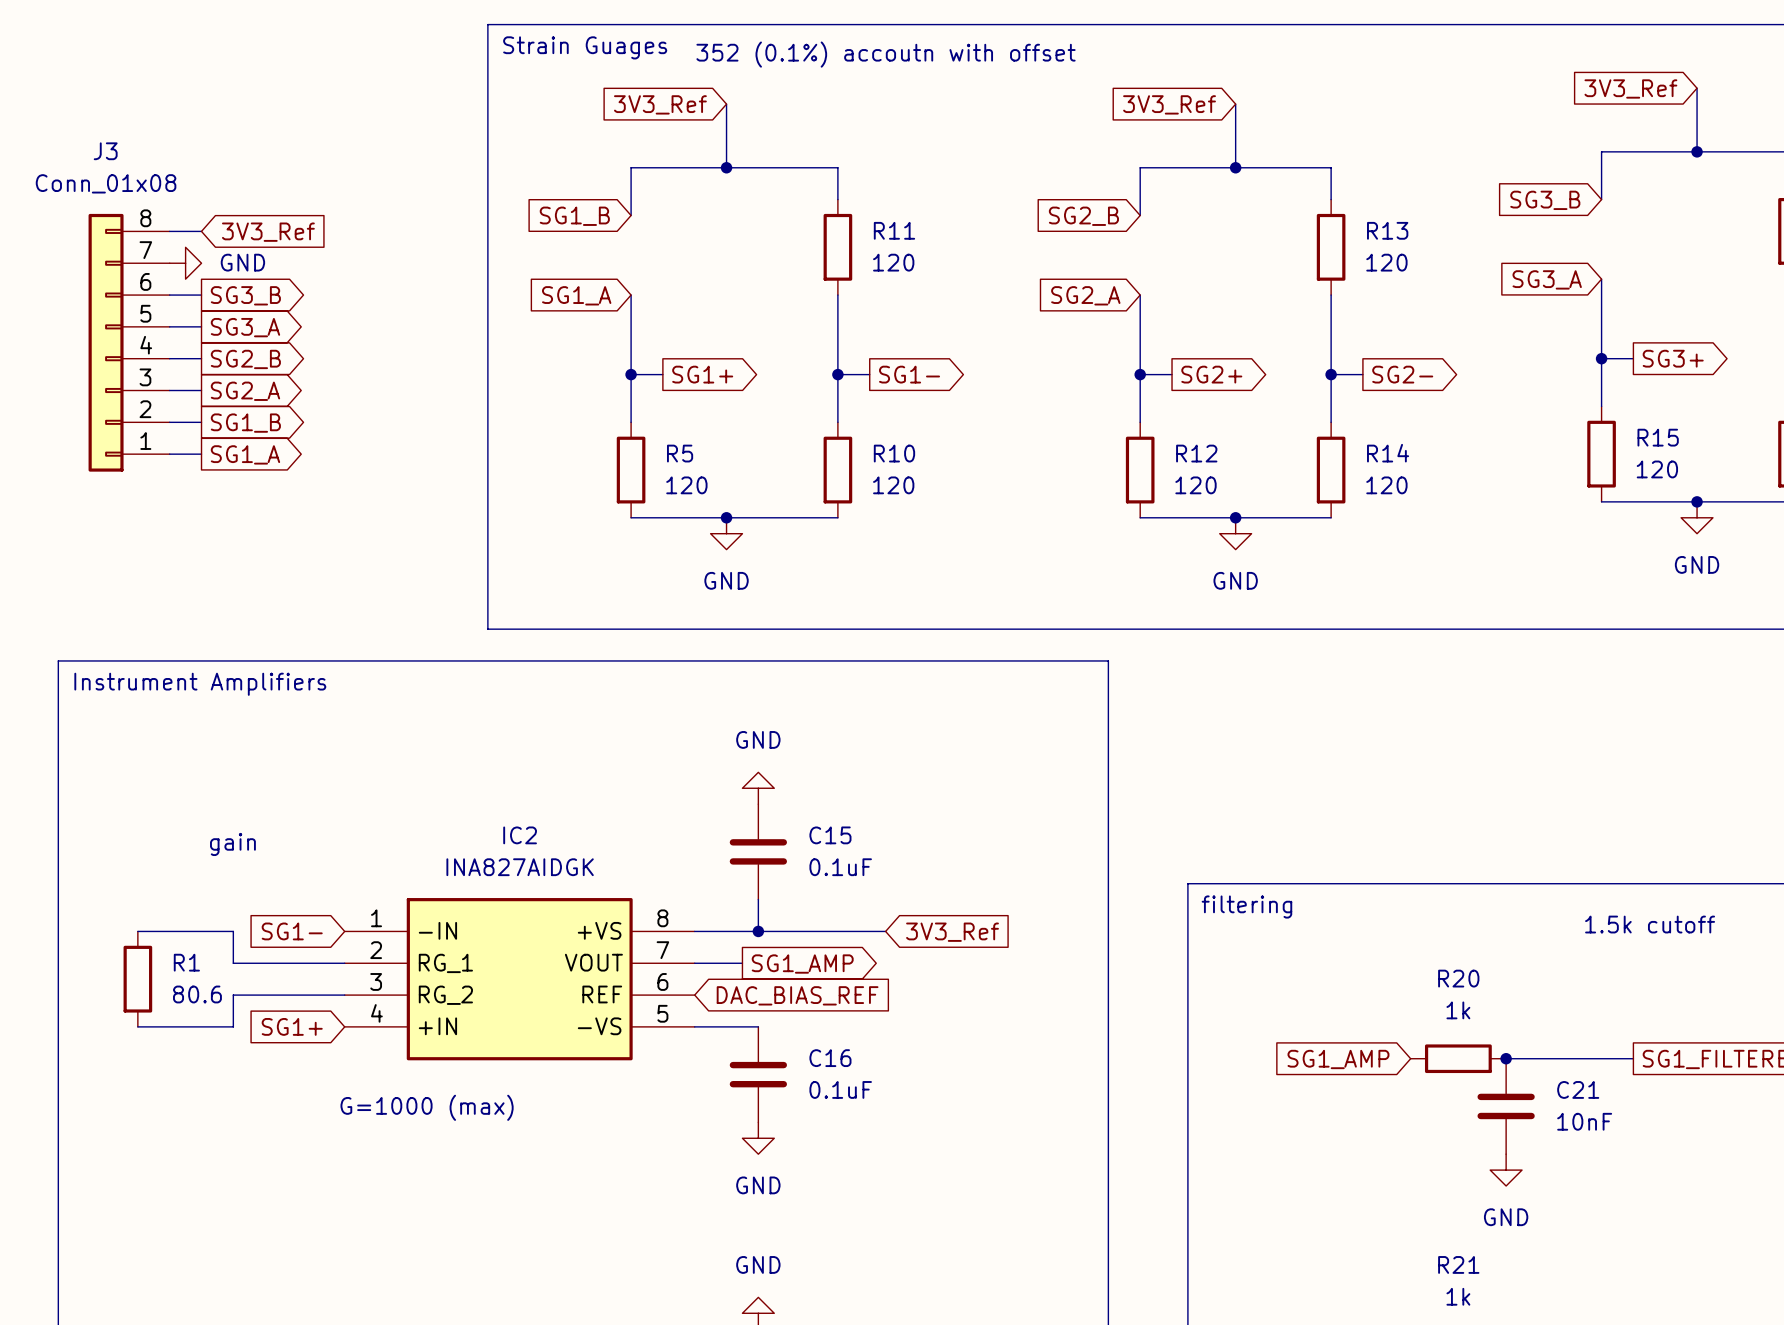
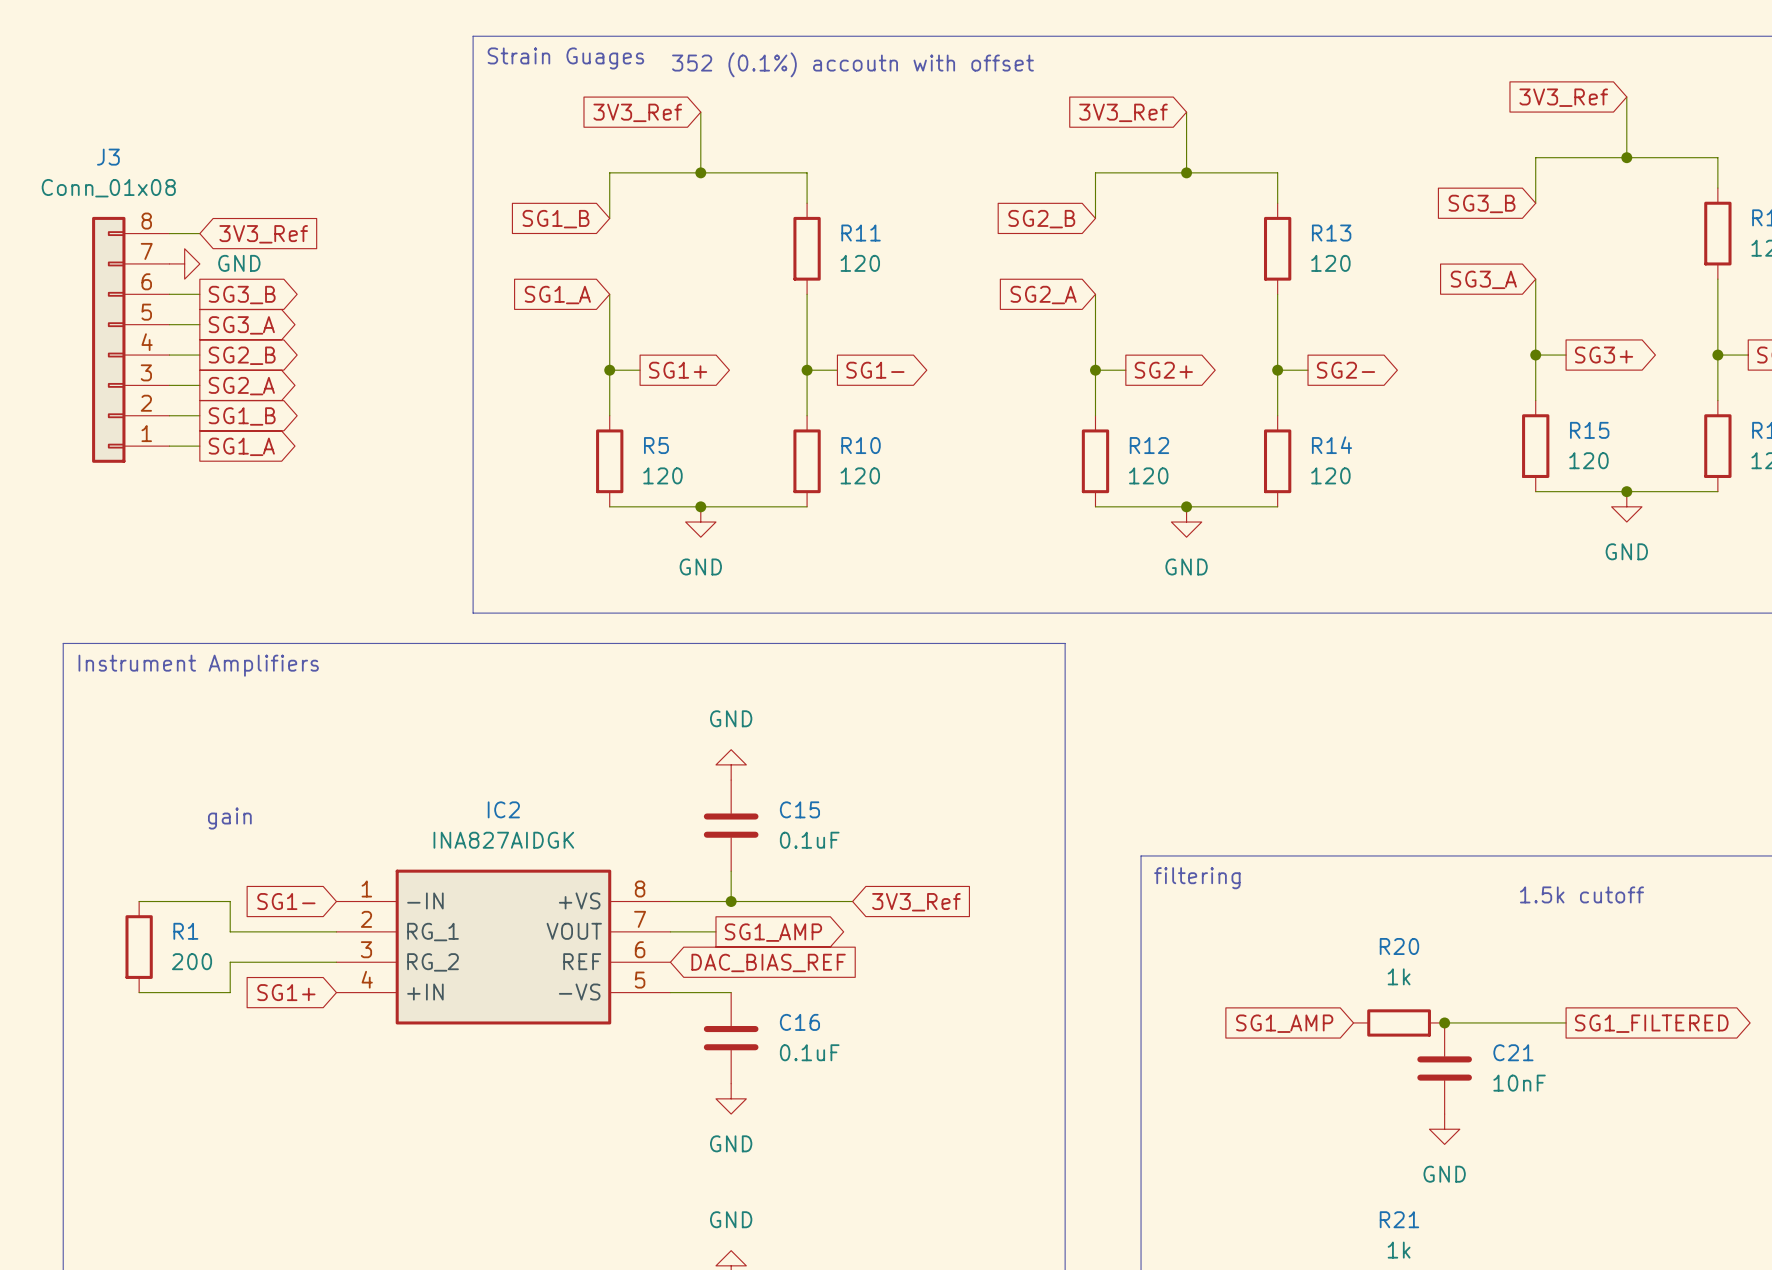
R1 value: 80.6 (197, 994) -> 200 (192, 961)
text: G=1000 (max) (427, 1107) -> none

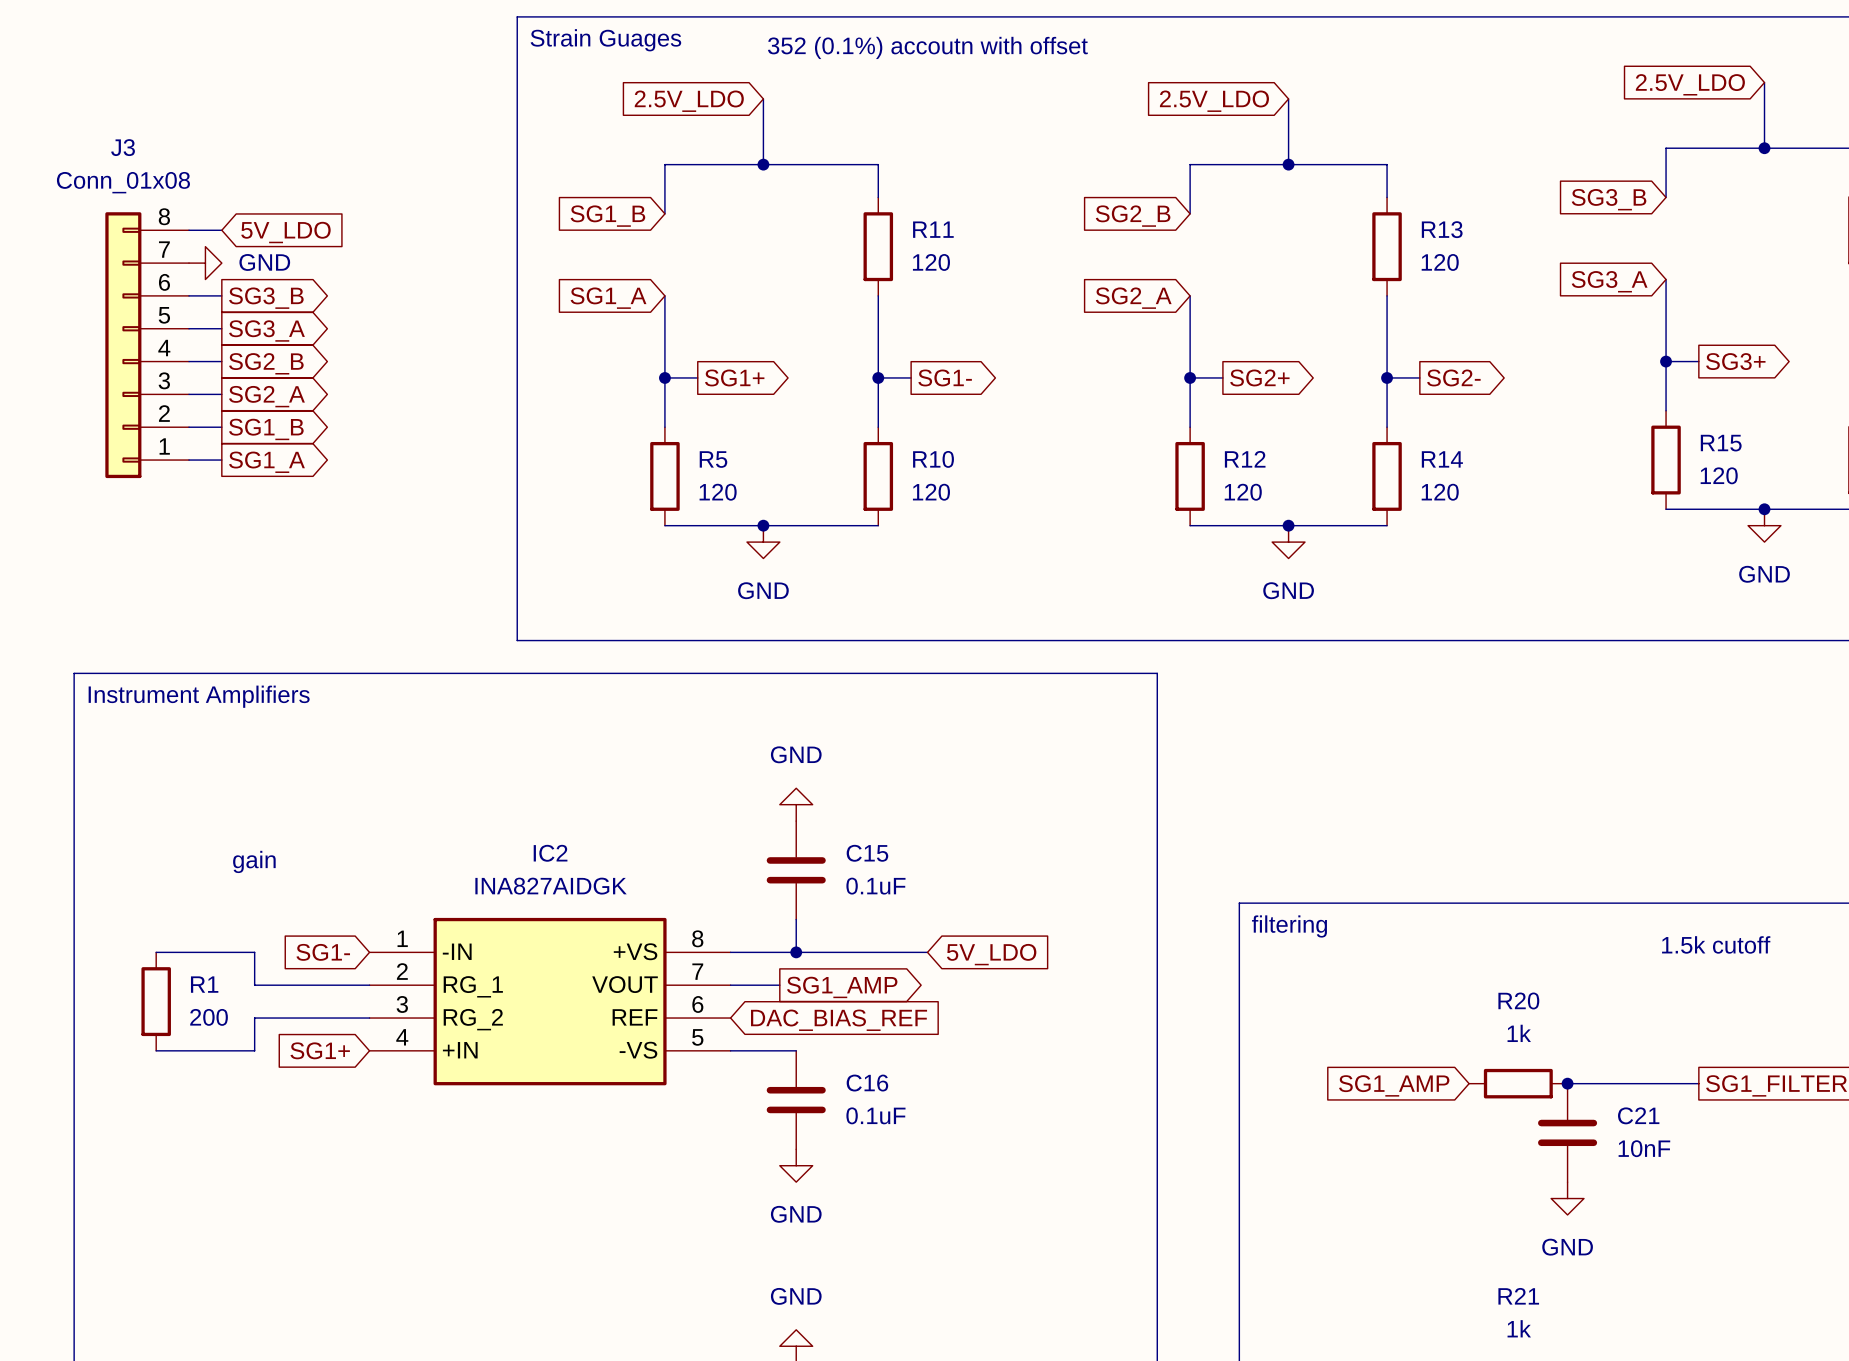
global label: 3V3_Ref (1563, 97) -> 2.5V_LDO (1690, 84)
global label: 3V3_Ref (637, 112) -> 2.5V_LDO (689, 101)
global label: 3V3_Ref (1123, 112) -> 2.5V_LDO (1214, 101)
global label: 3V3_Ref (263, 234) -> 5V_LDO (285, 232)
global label: 3V3_Ref (916, 902) -> 5V_LDO (991, 954)

